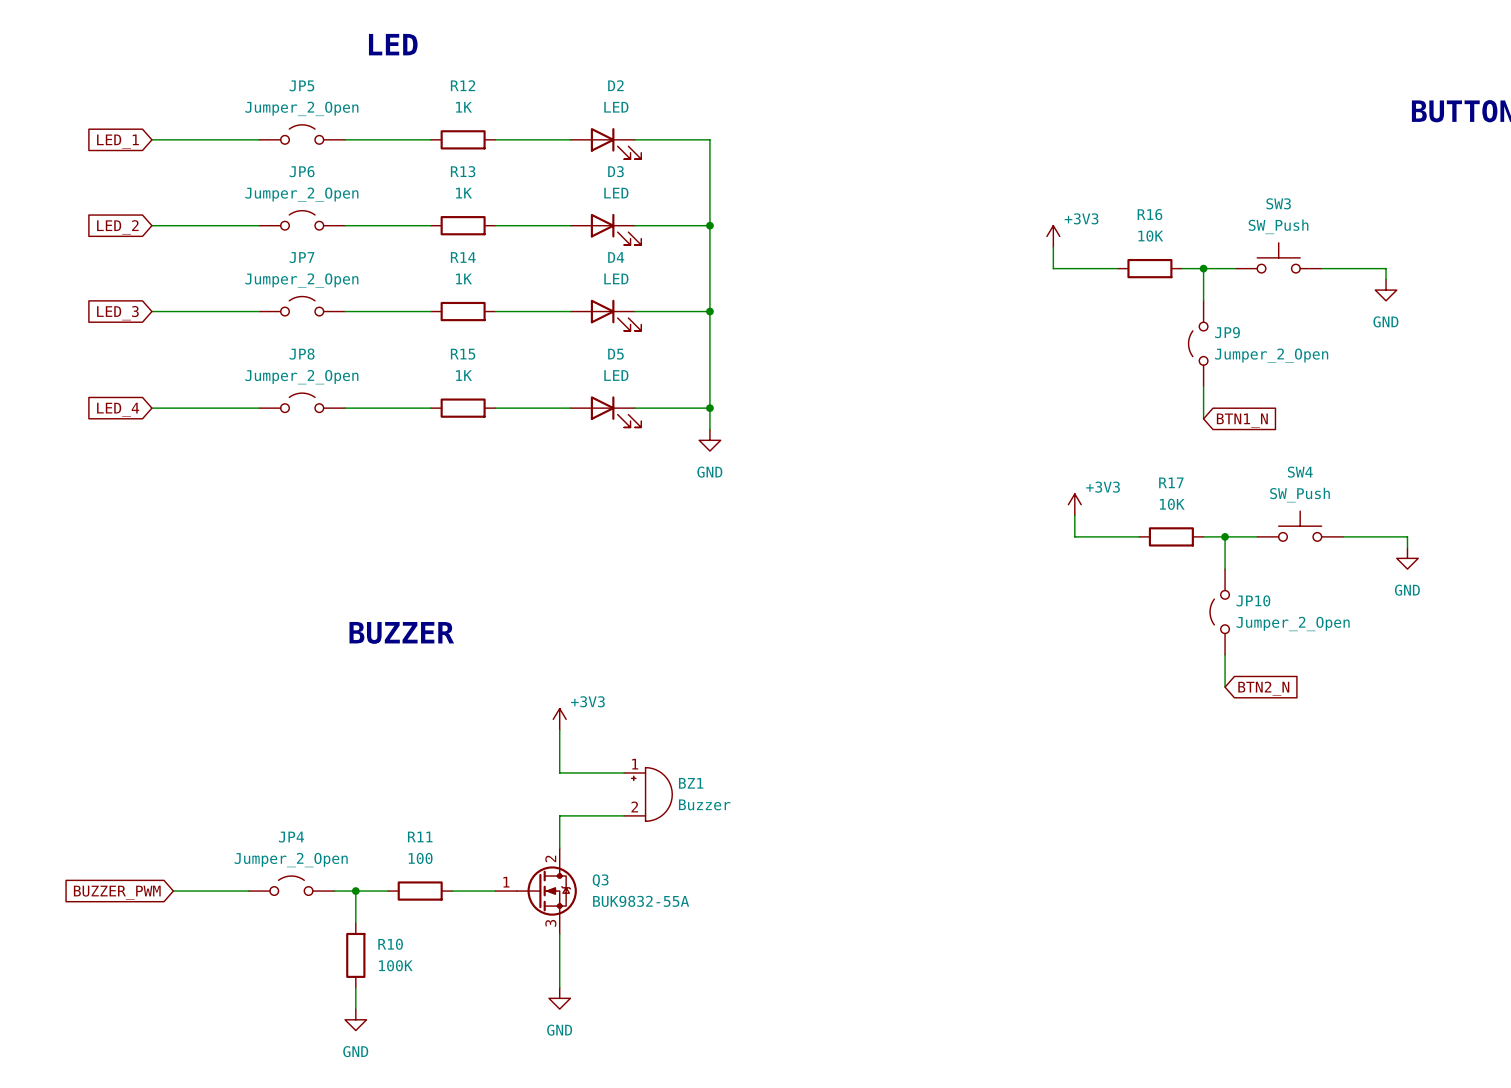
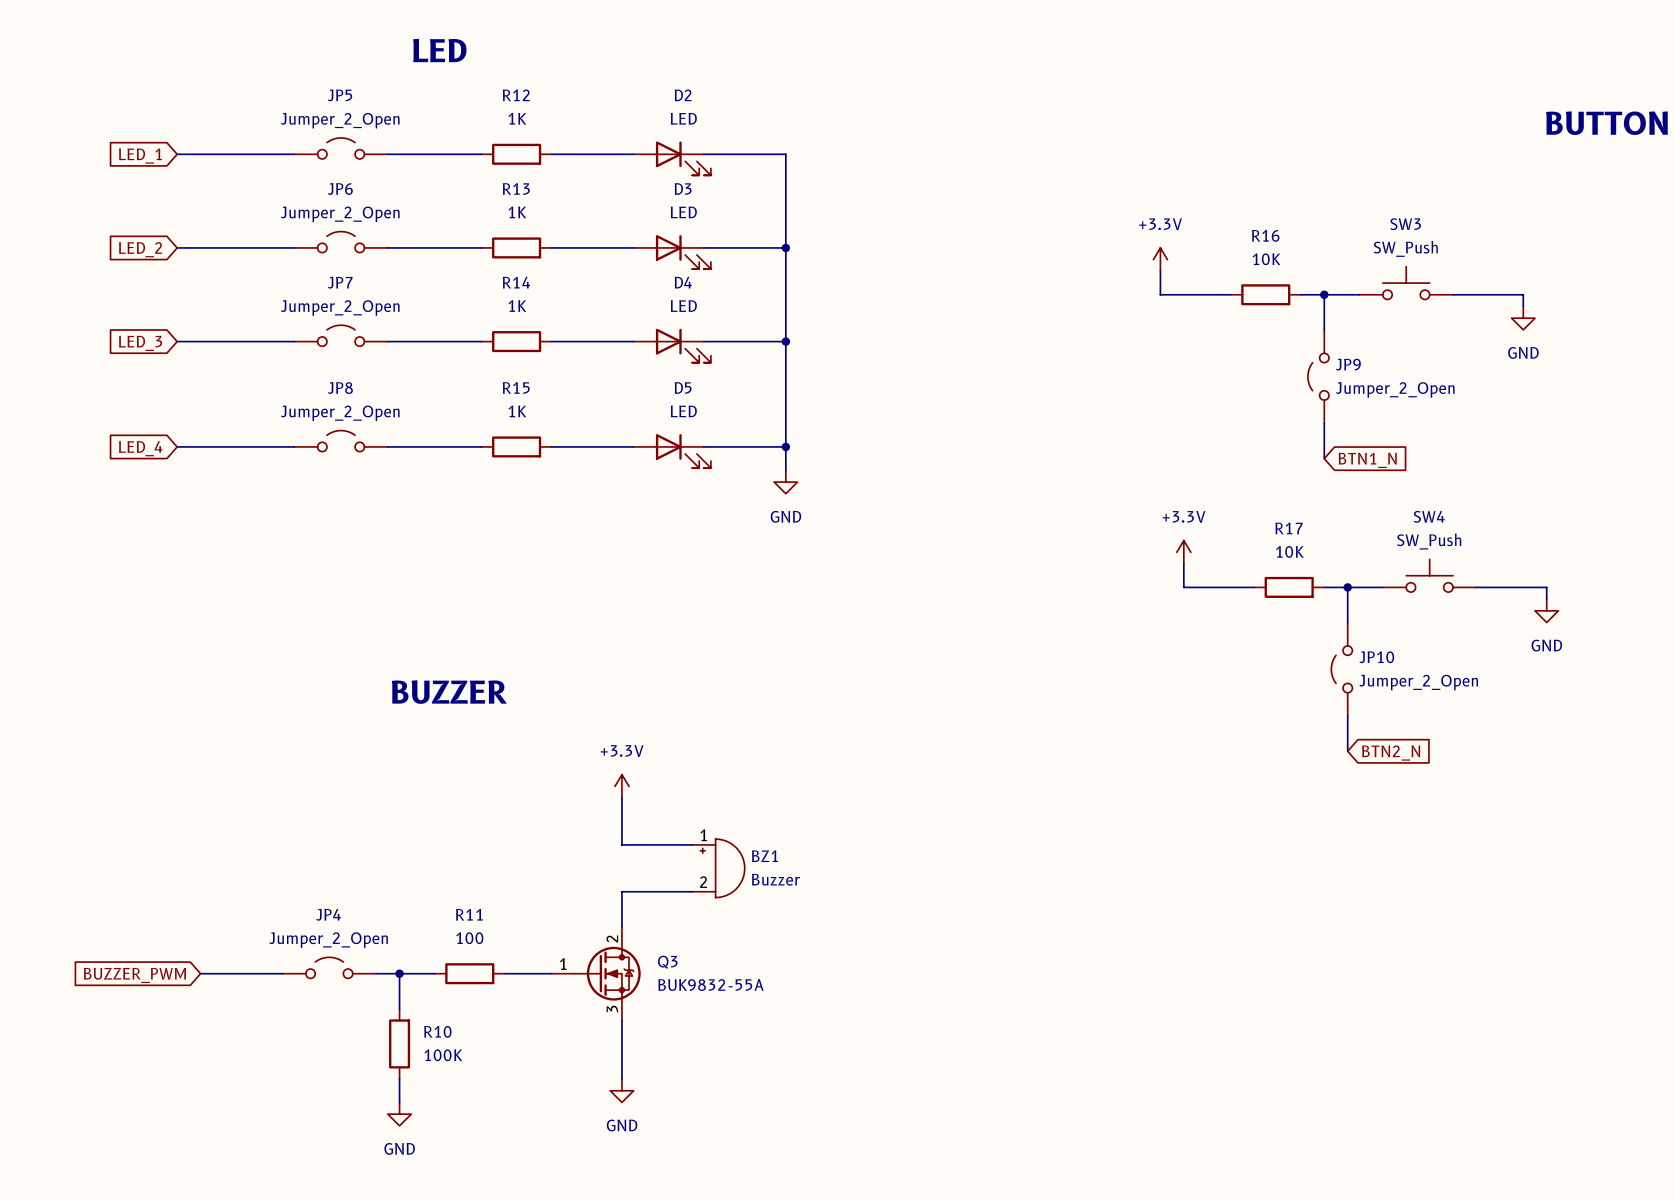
power symbol: +3V3 (1053, 236) -> +3.3V (1160, 259)
power symbol: +3V3 (1074, 504) -> +3.3V (1183, 552)
power symbol: +3V3 (559, 719) -> +3.3V (621, 786)

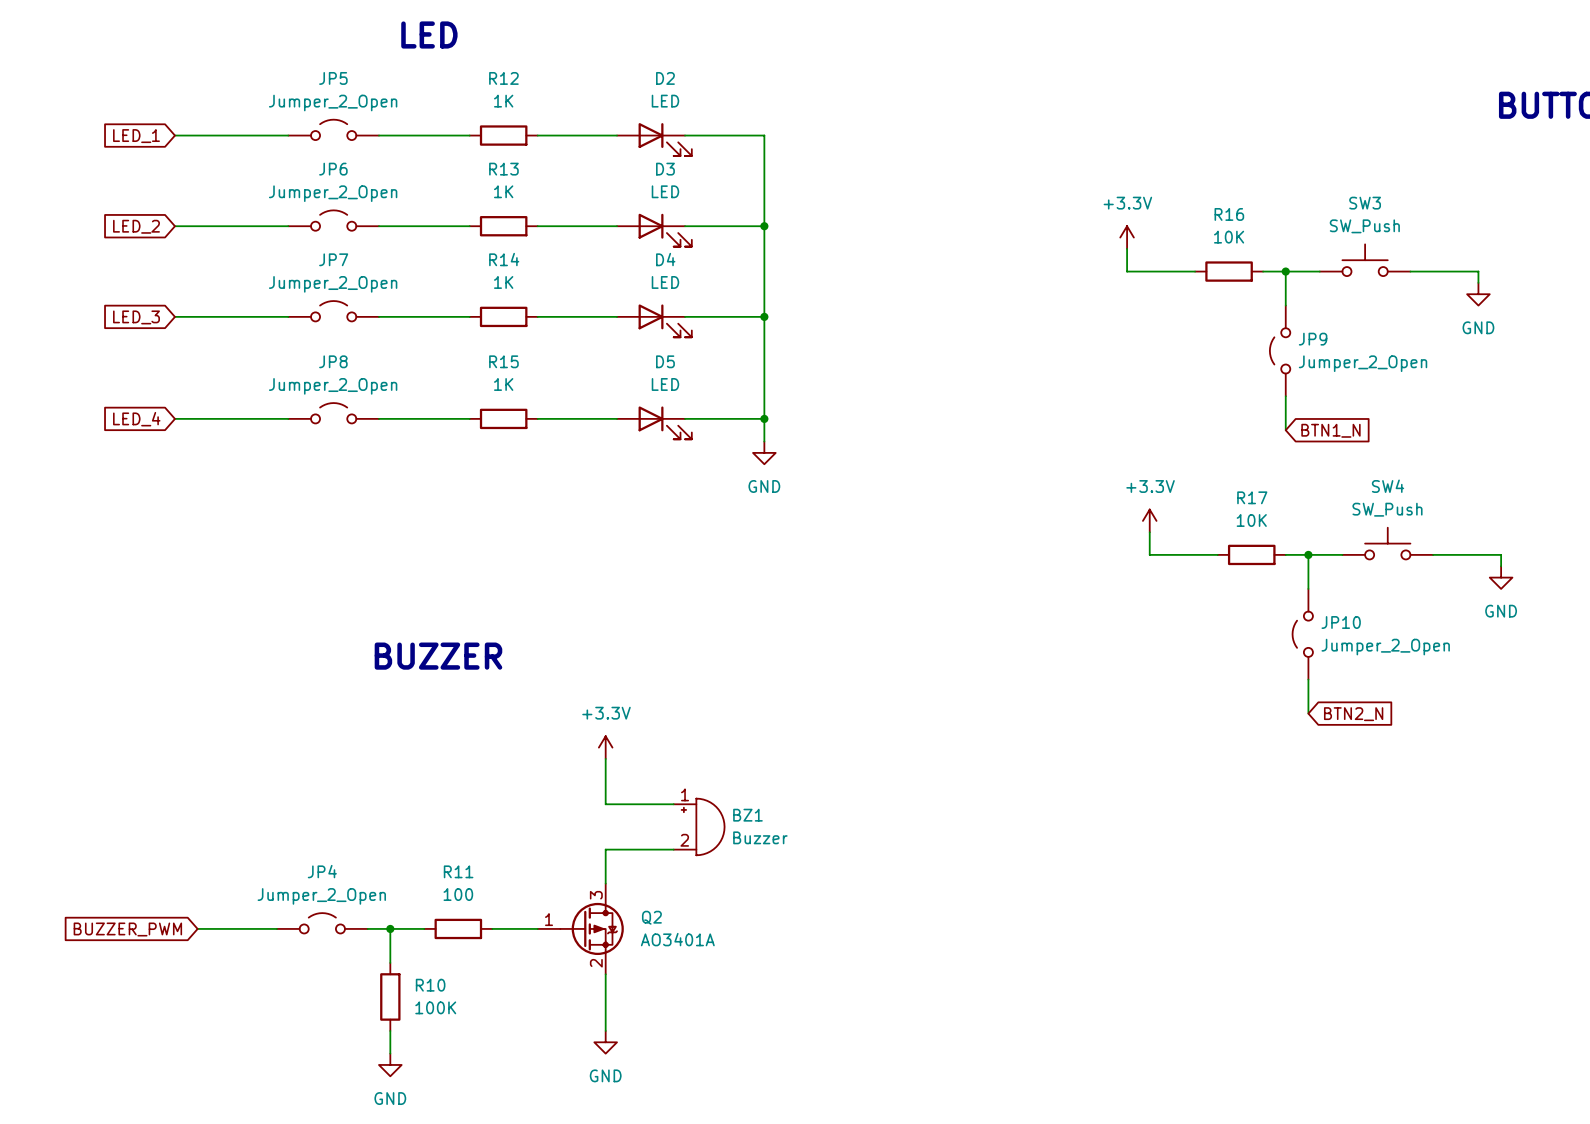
Q3: BUK9832-55A (596, 973) -> none
Q2: none -> AO3401A (580, 928)

